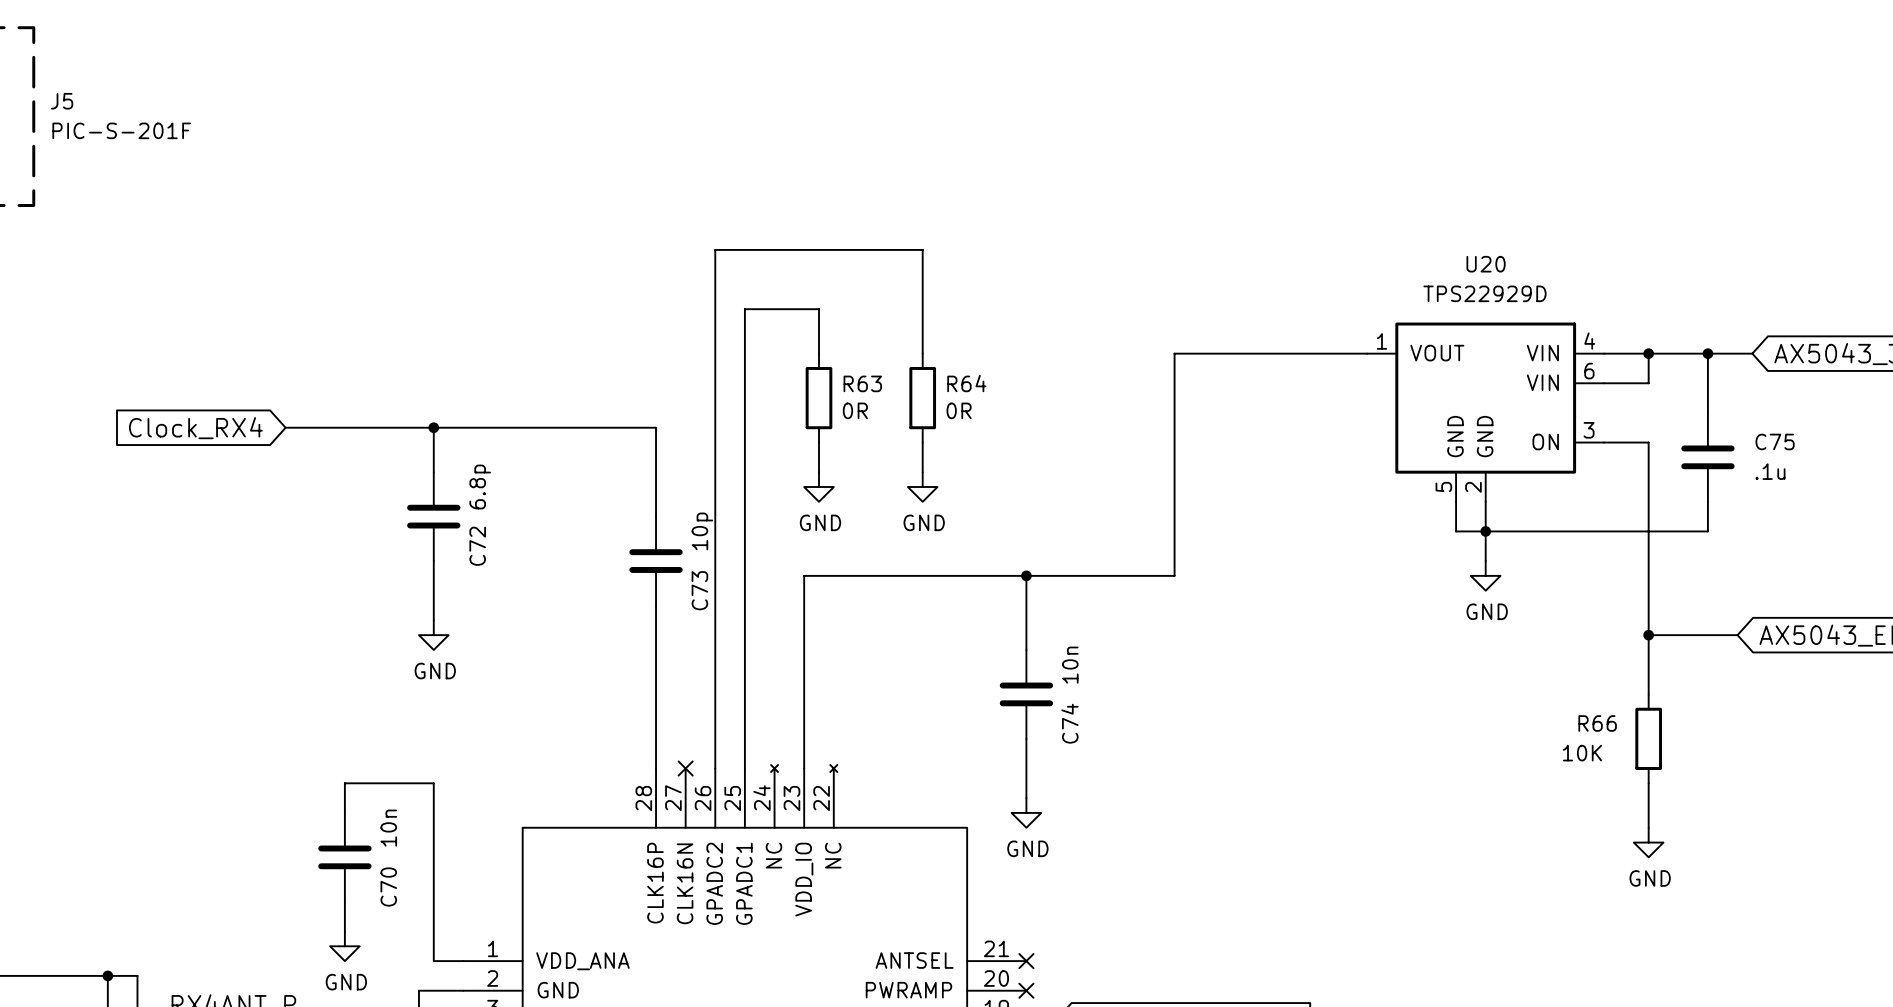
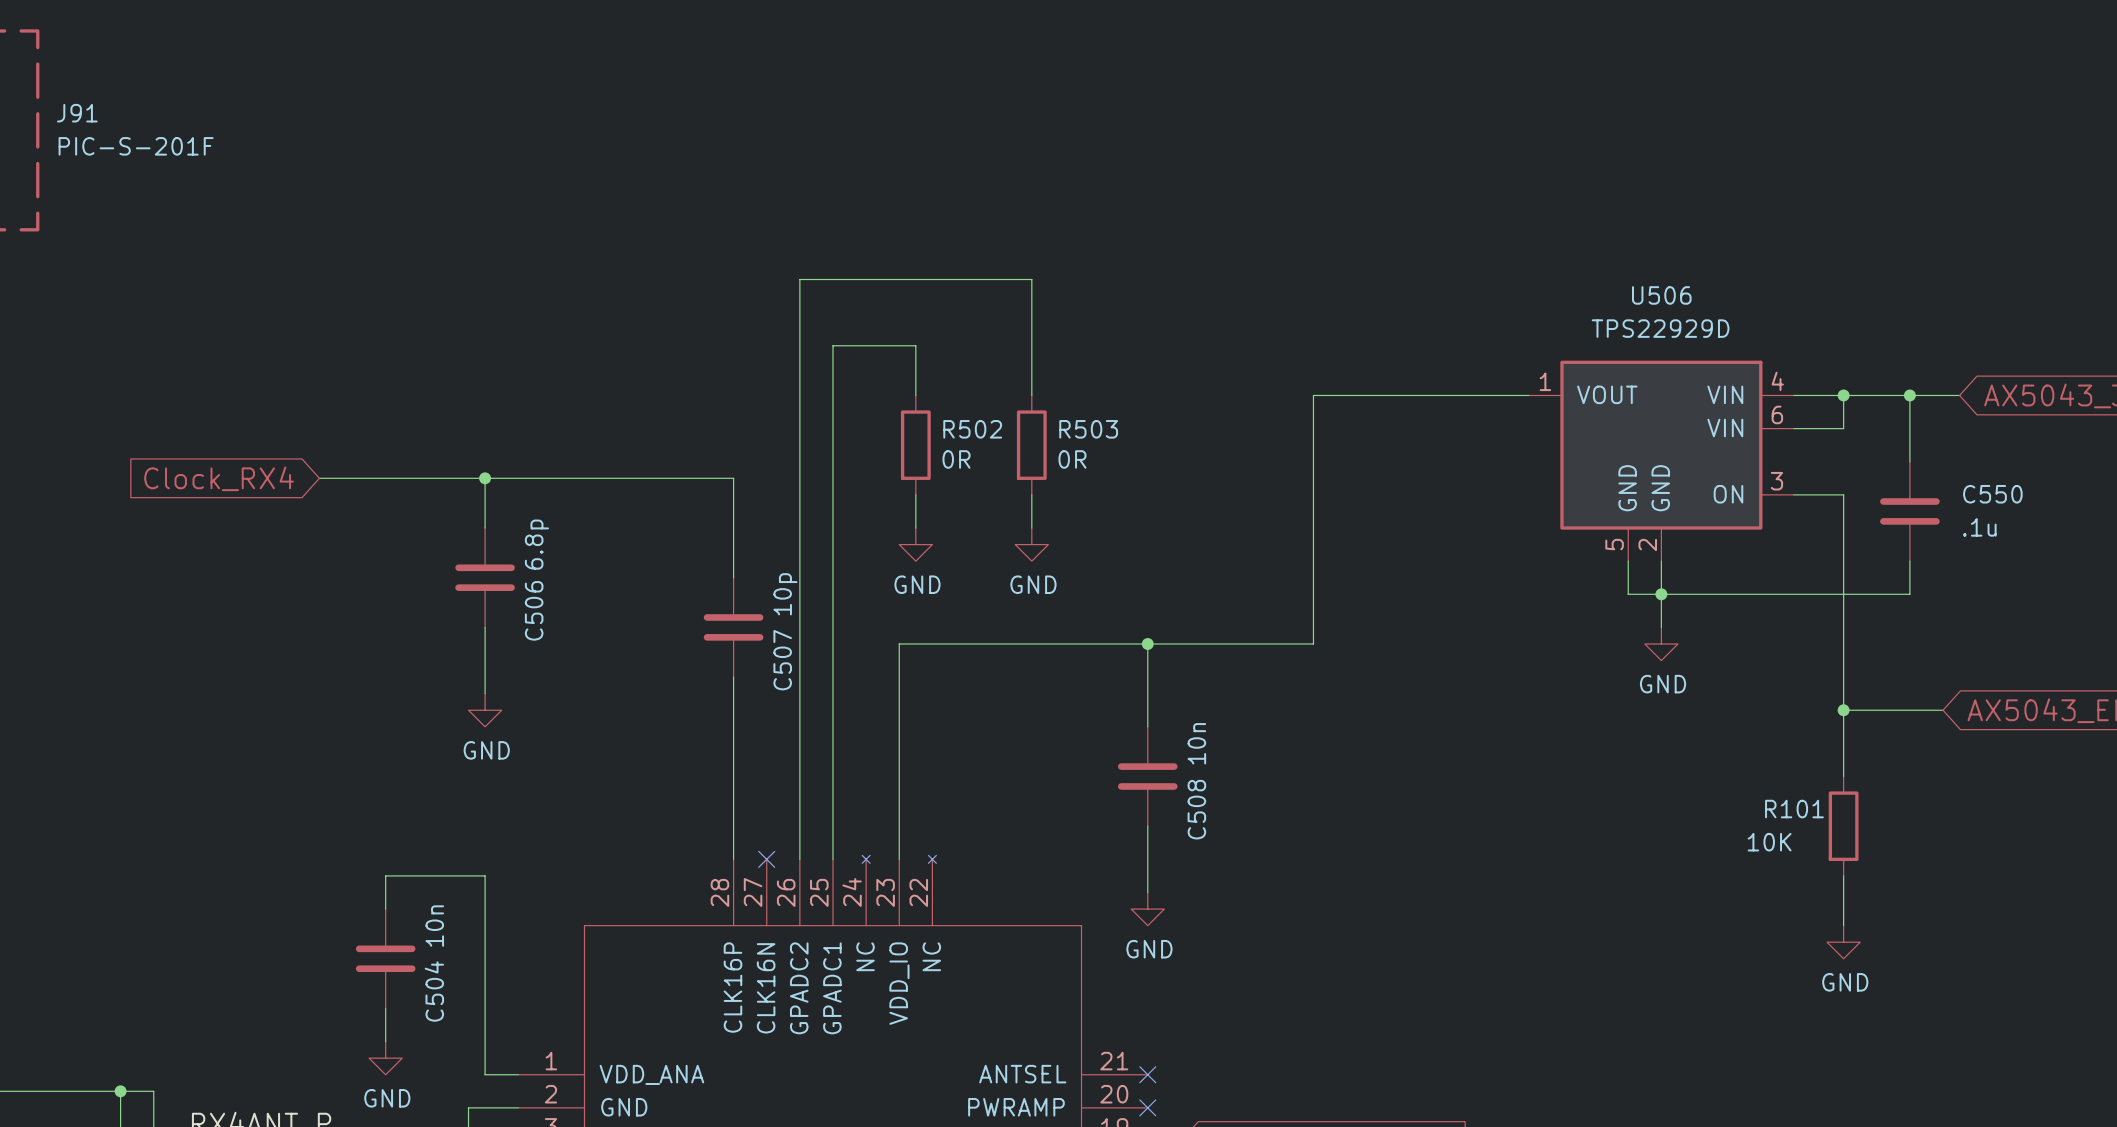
J5 name: J5 (62, 101) -> J91 (77, 113)
U20 name: U20 (1486, 264) -> U506 (1661, 295)
R63 name: R63 (862, 383) -> R502 (972, 429)
R64 name: R64 (966, 383) -> R503 (1088, 429)
C75 name: C75 (1775, 441) -> C550 (1992, 494)
C72 name: C72 (477, 546) -> C506 (534, 610)
C73 name: C73 (699, 590) -> C507 (782, 660)
C74 name: C74 (1069, 723) -> C508 (1196, 809)
R66 name: R66 (1597, 723) -> R101 (1794, 809)
C70 name: C70 (388, 887) -> C504 (434, 991)

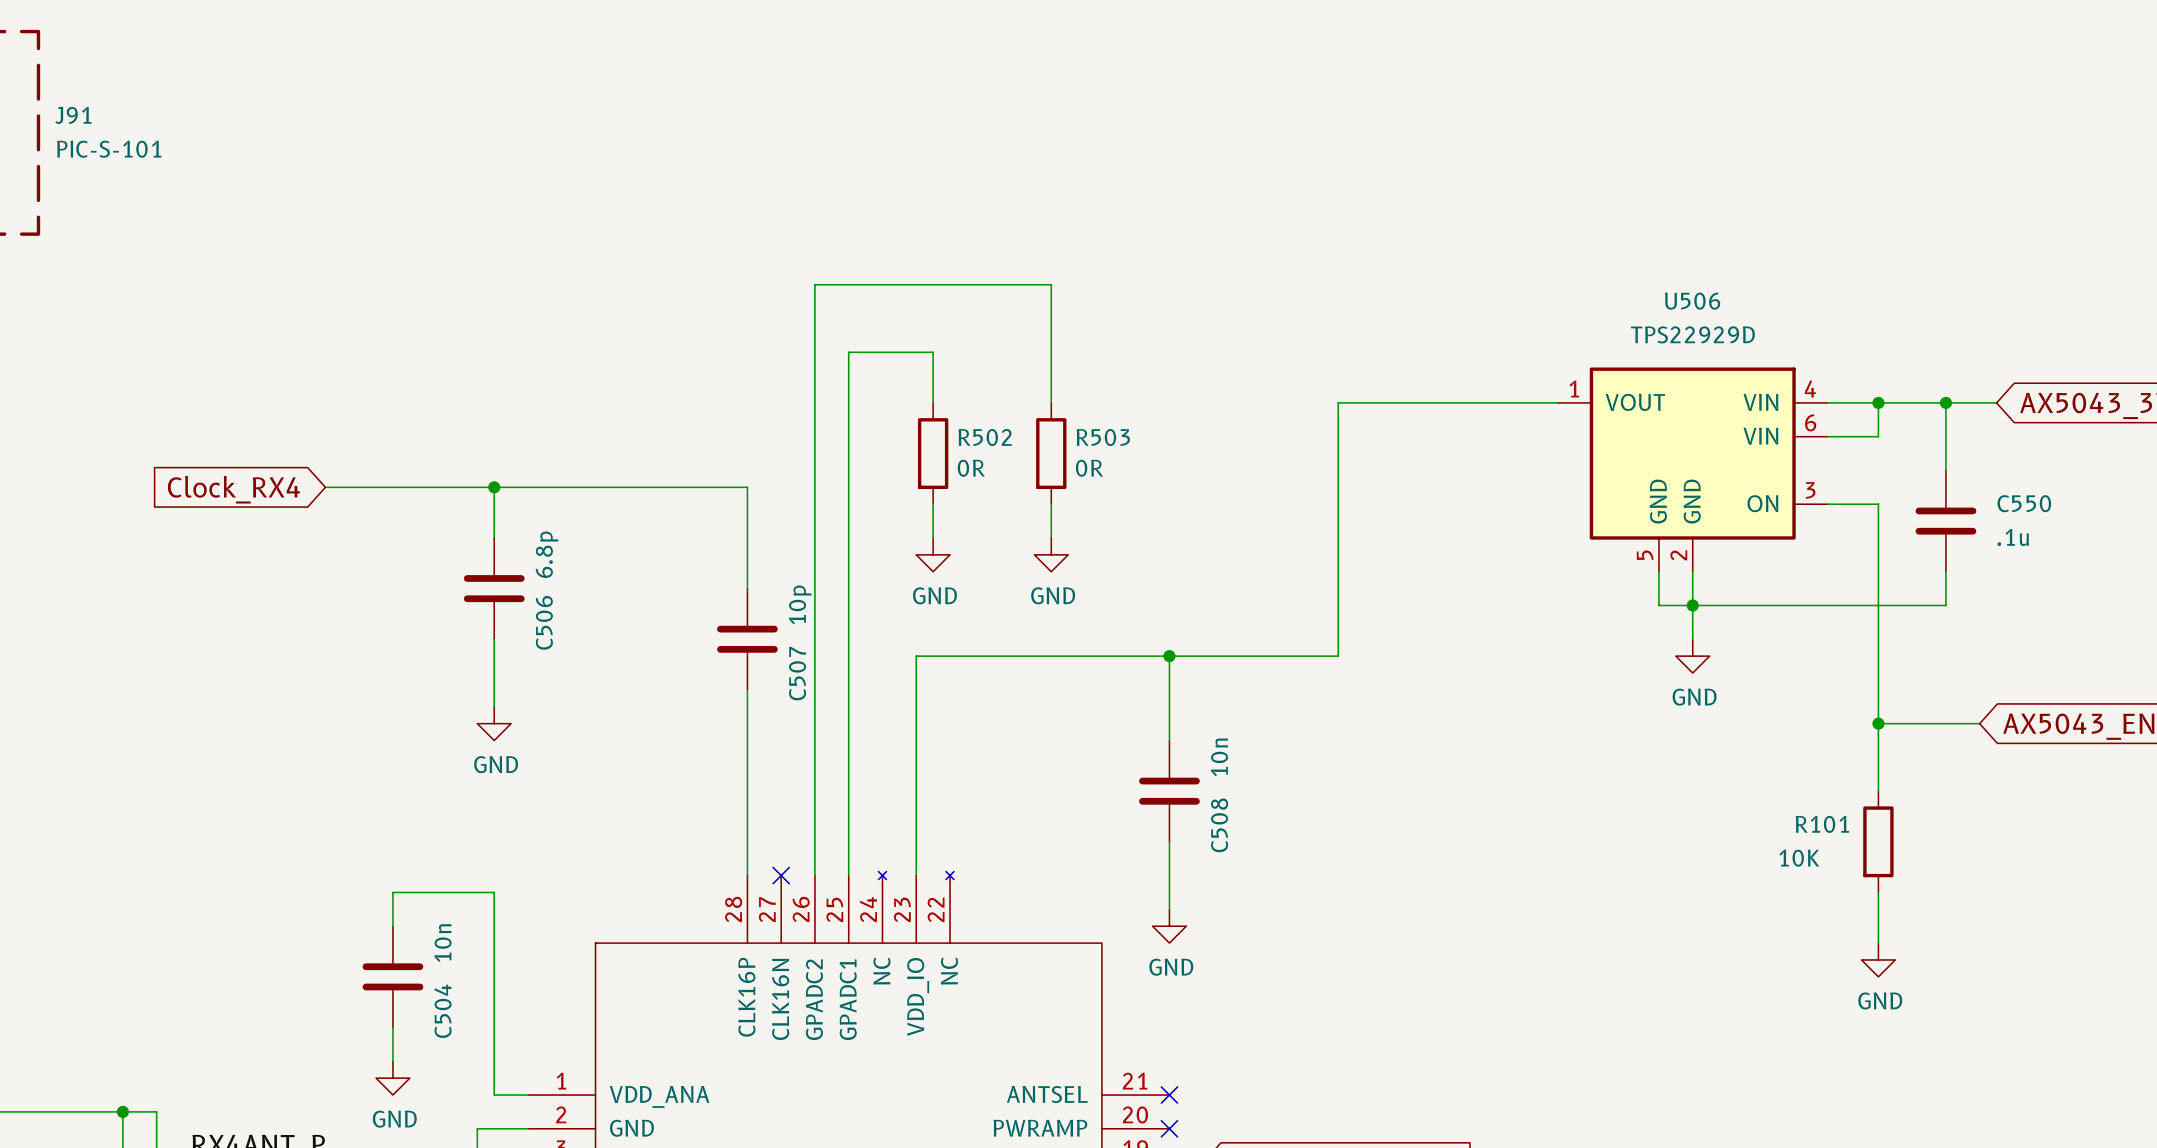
J91 value: PIC-S-201F (136, 146) -> PIC-S-101 (109, 149)

